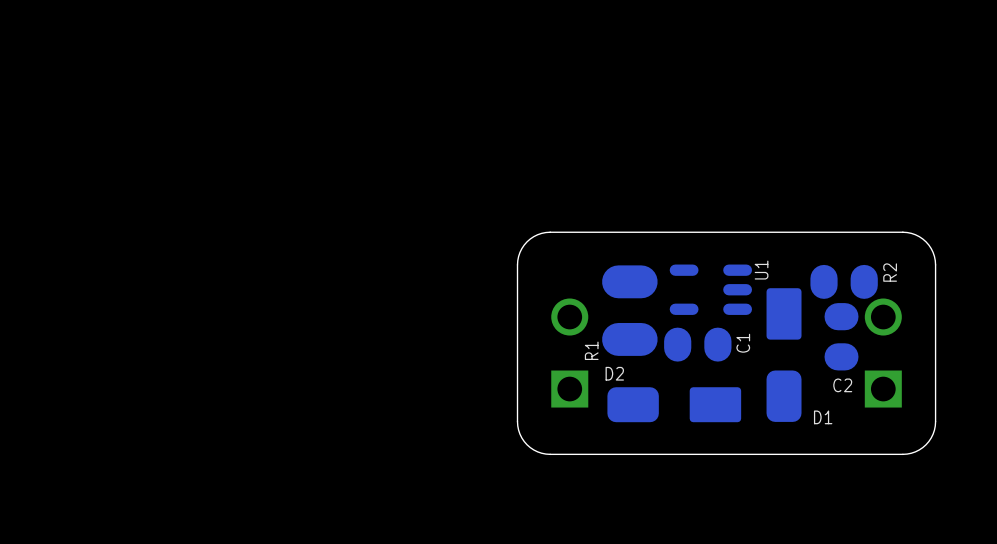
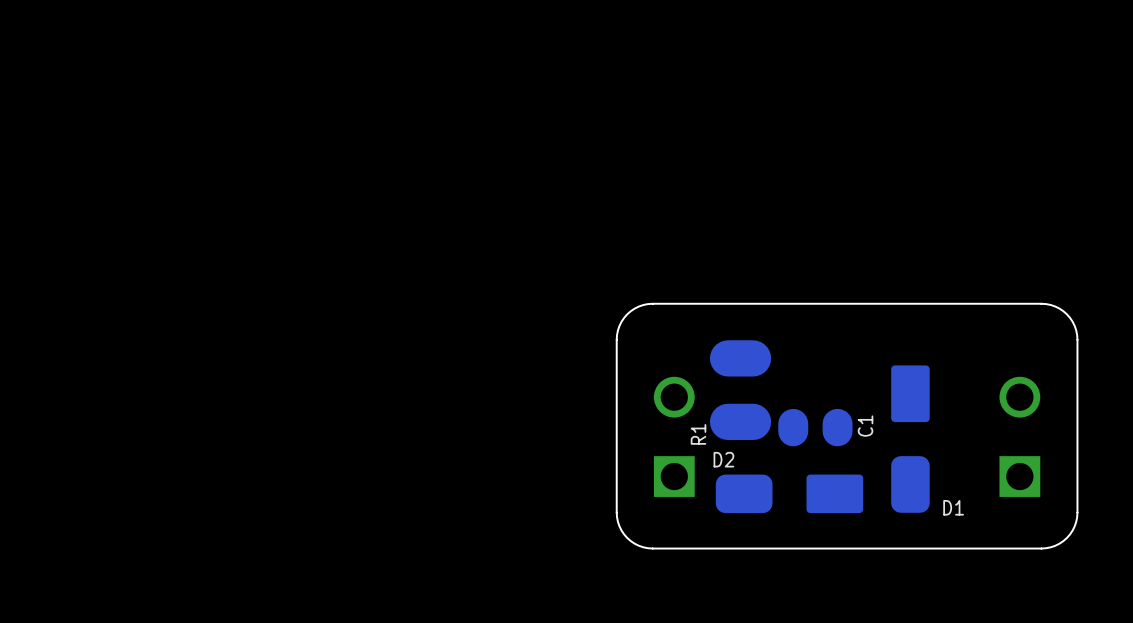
R2: (844, 281) -> none
U1: (710, 289) -> none
C2: (841, 336) -> none

